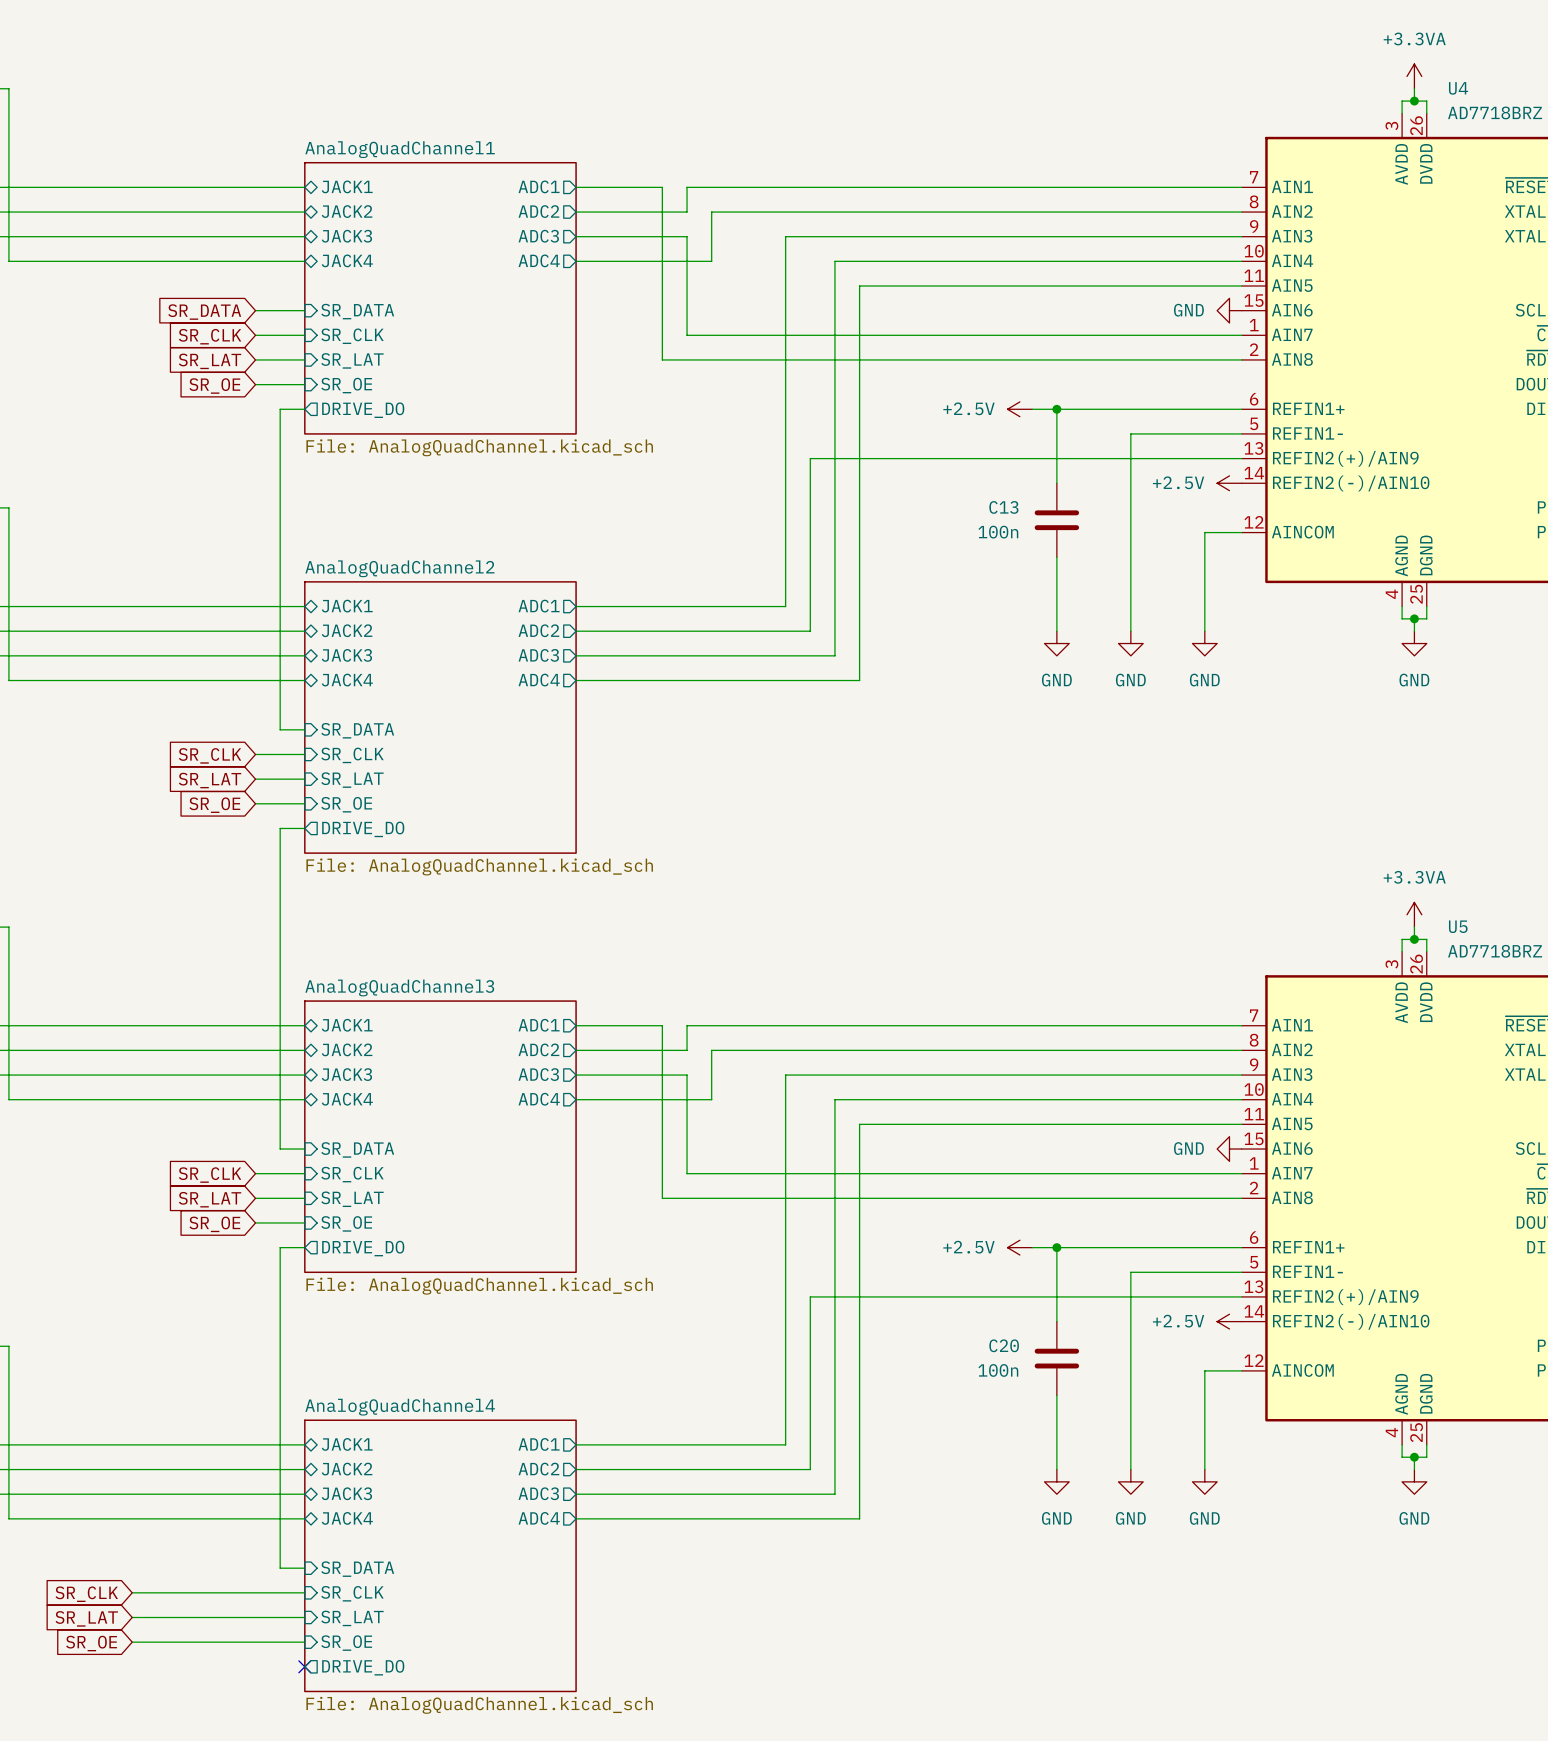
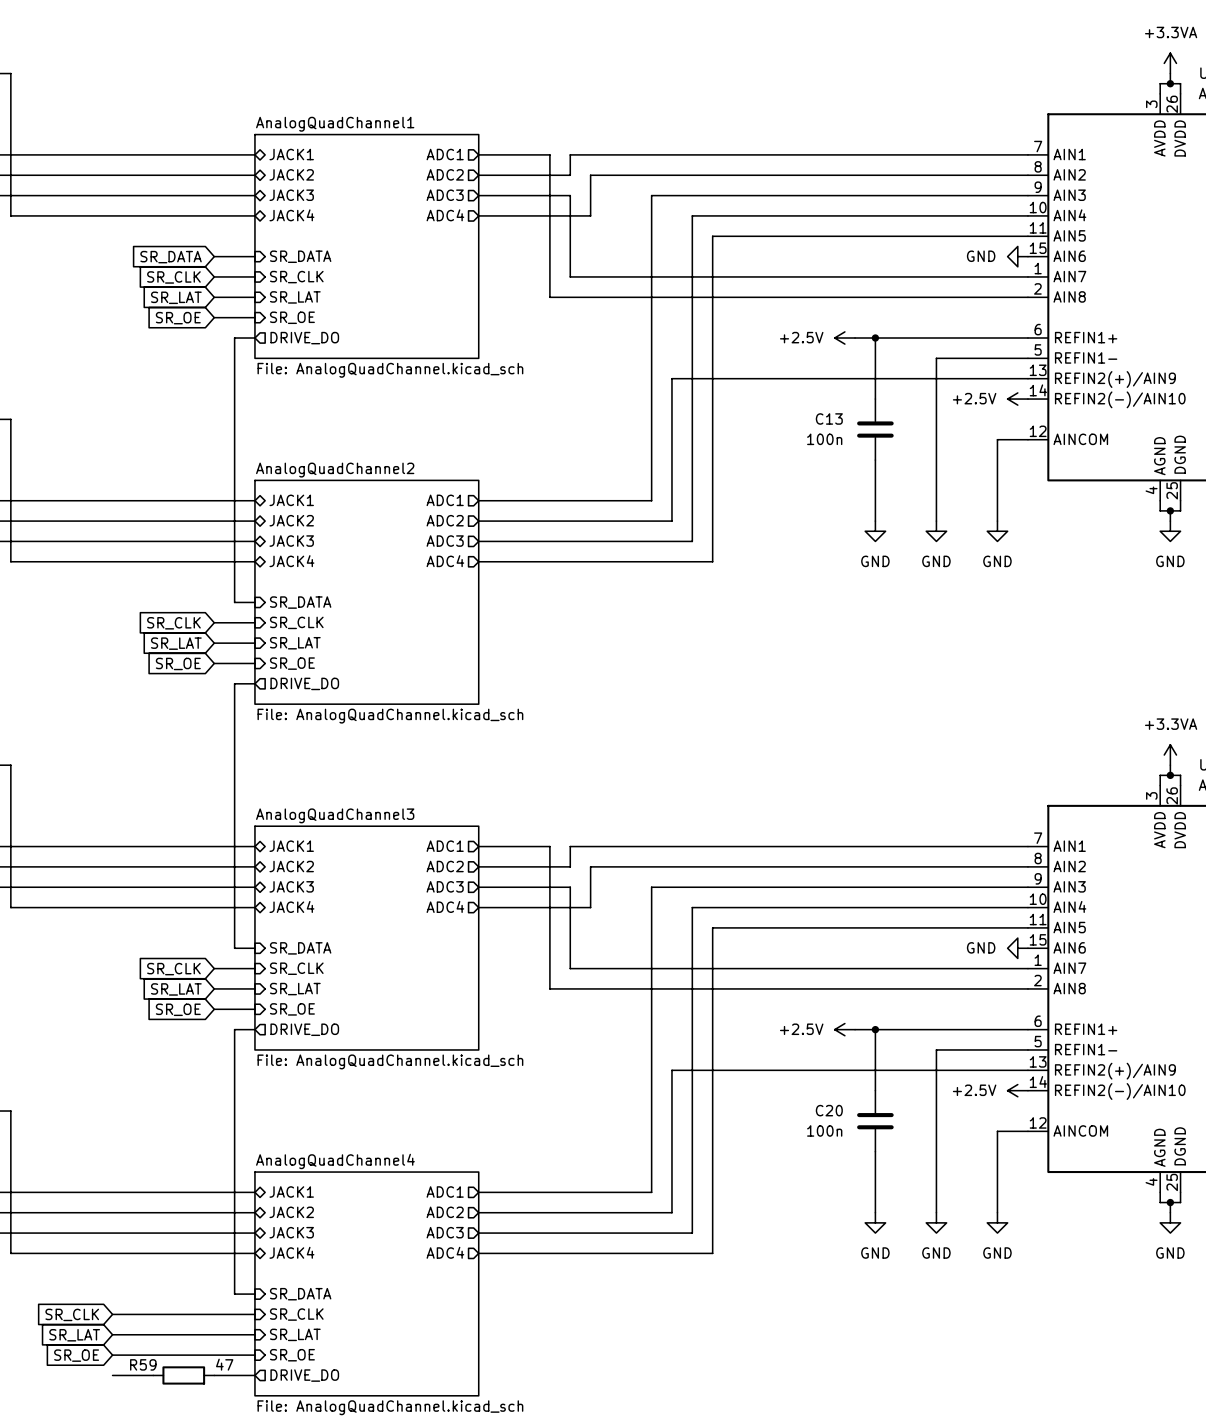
wire: none -> (112, 1375) (153, 1375)
R59: none -> 47 (183, 1375)
wire: none -> (214, 1375) (254, 1375)
no-connect mark: (304, 1666) -> none

